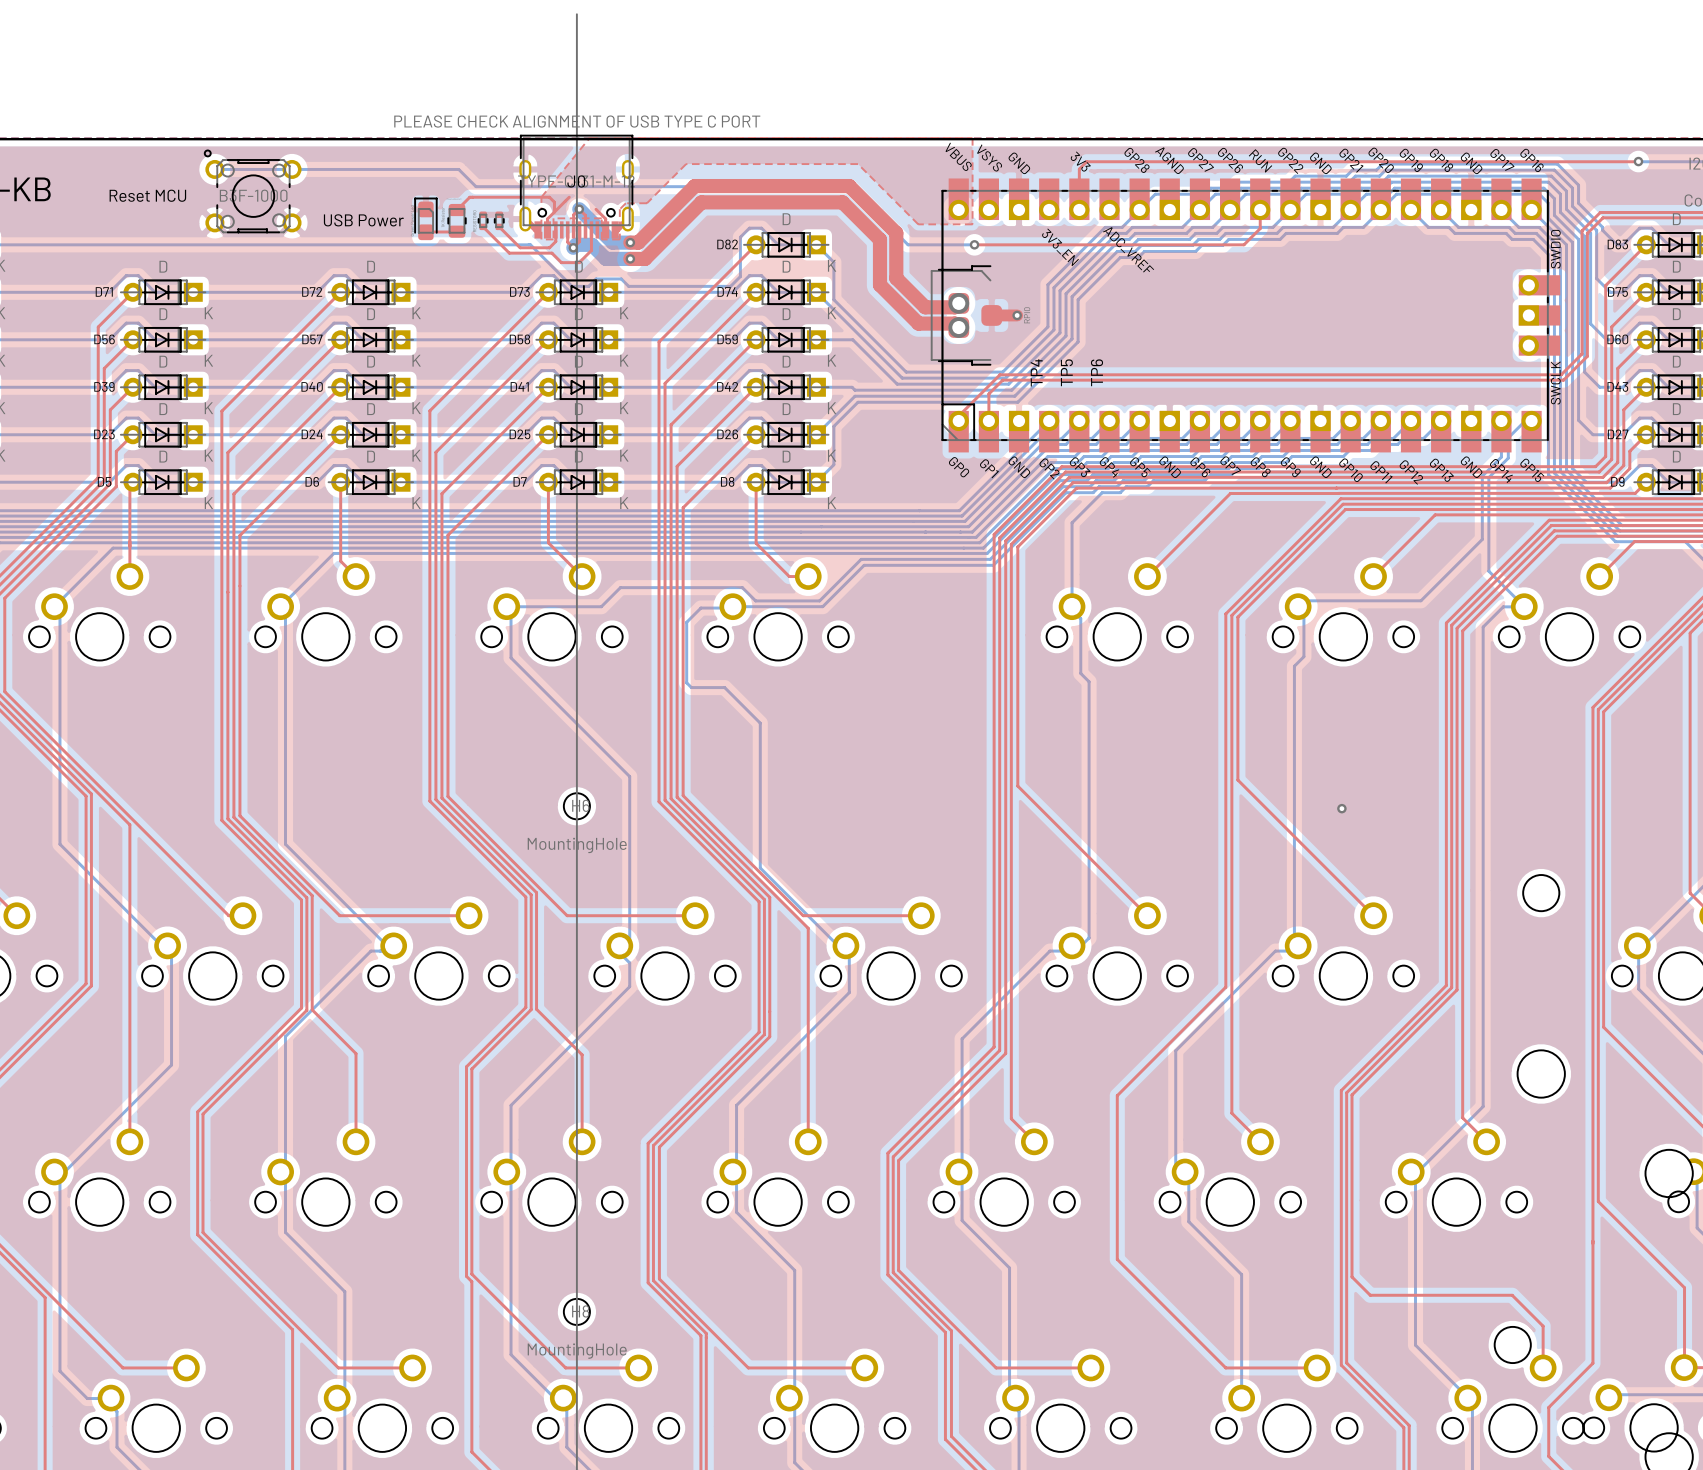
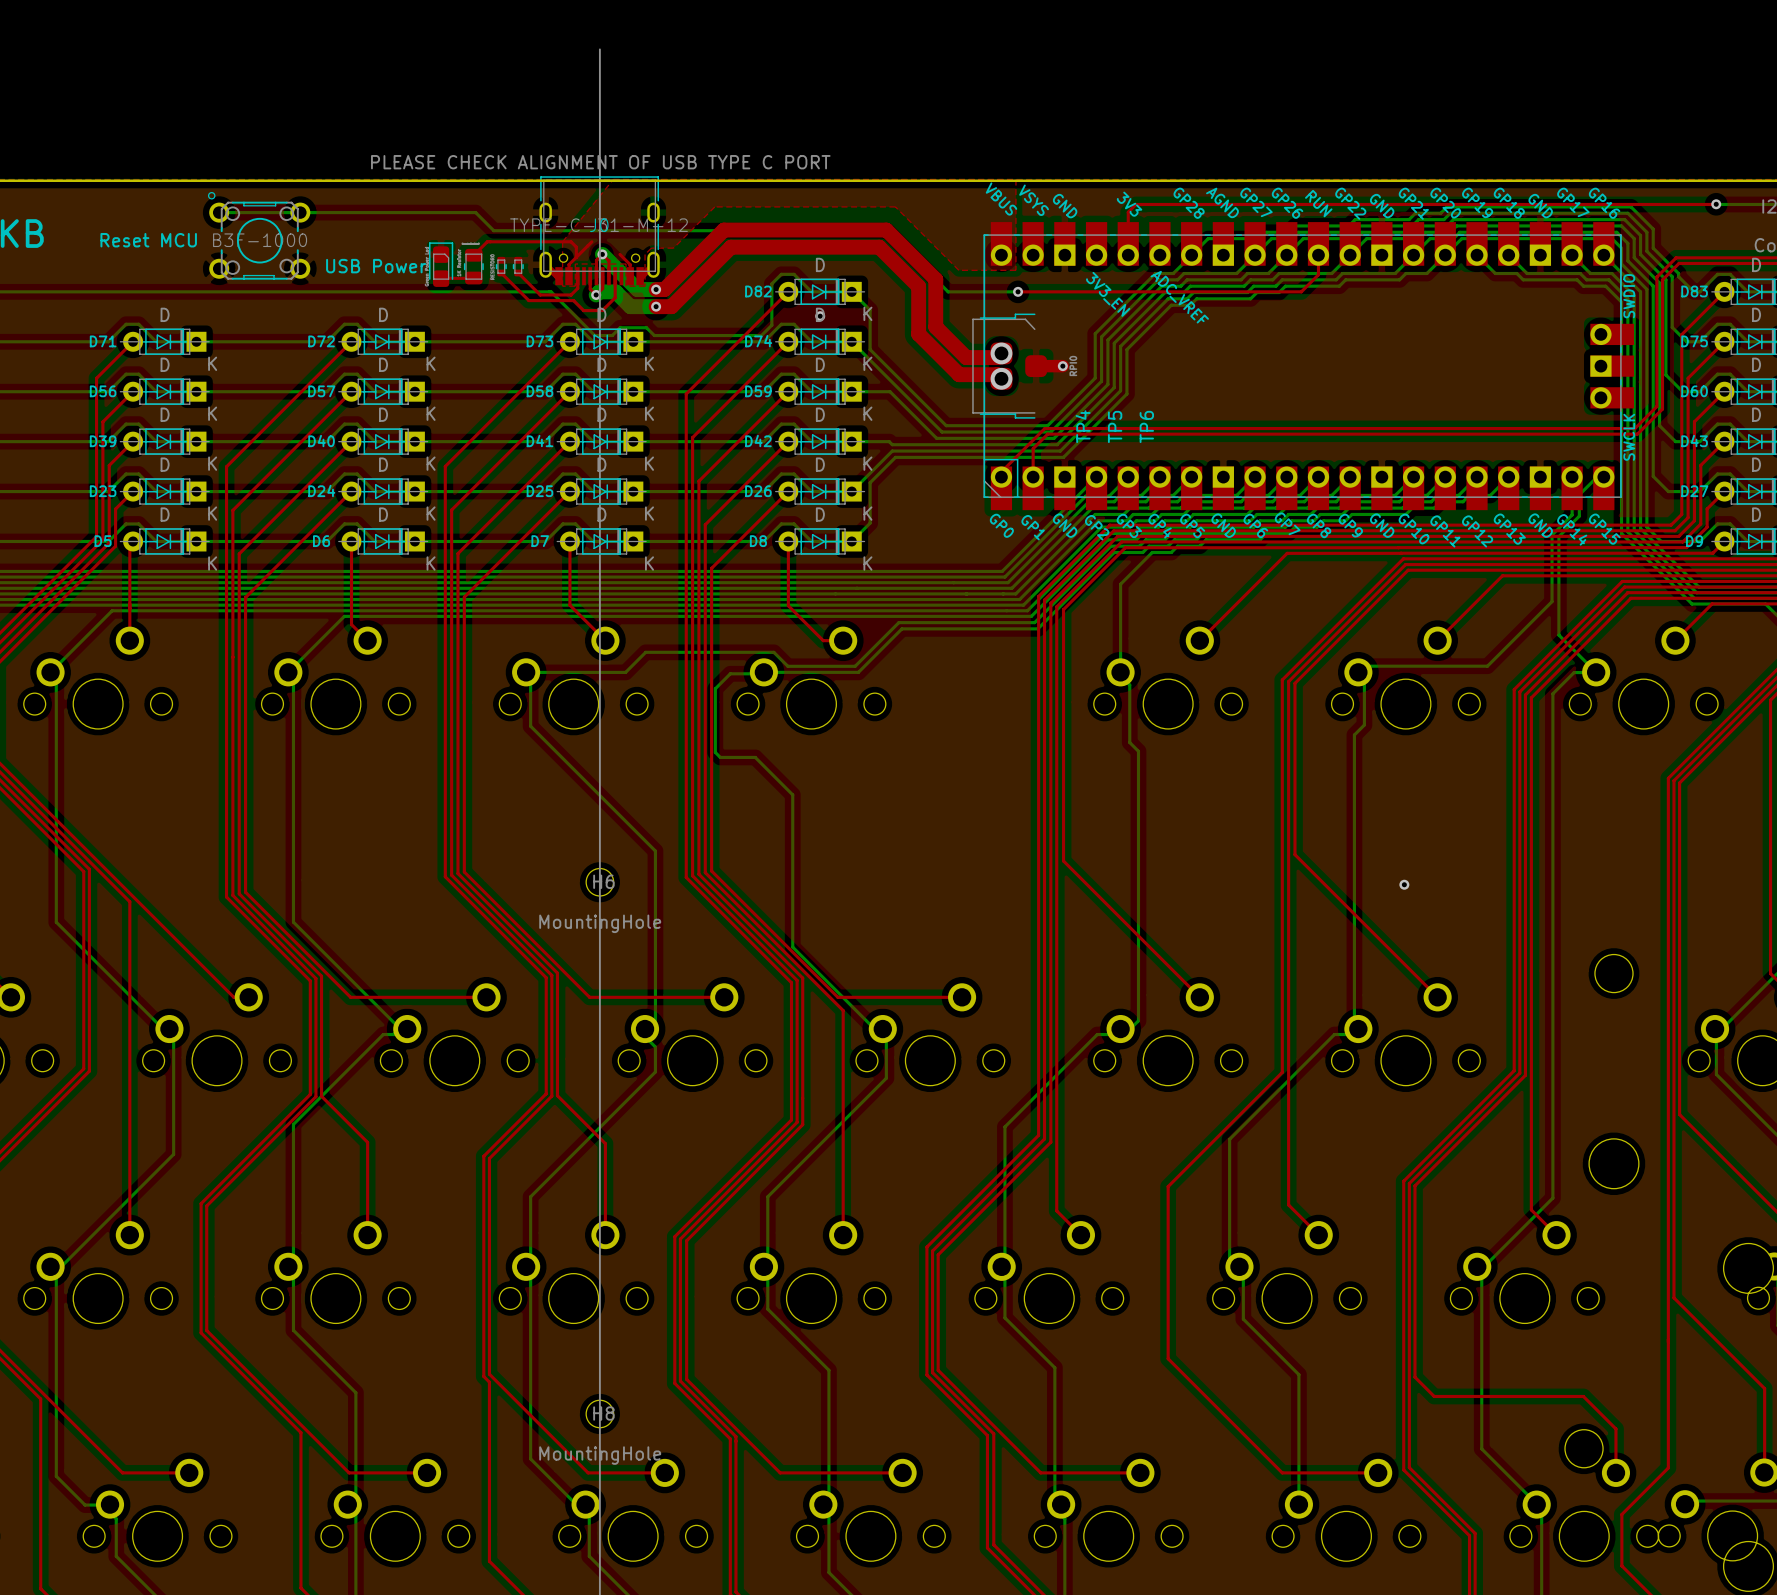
via: none -> (820, 316)

